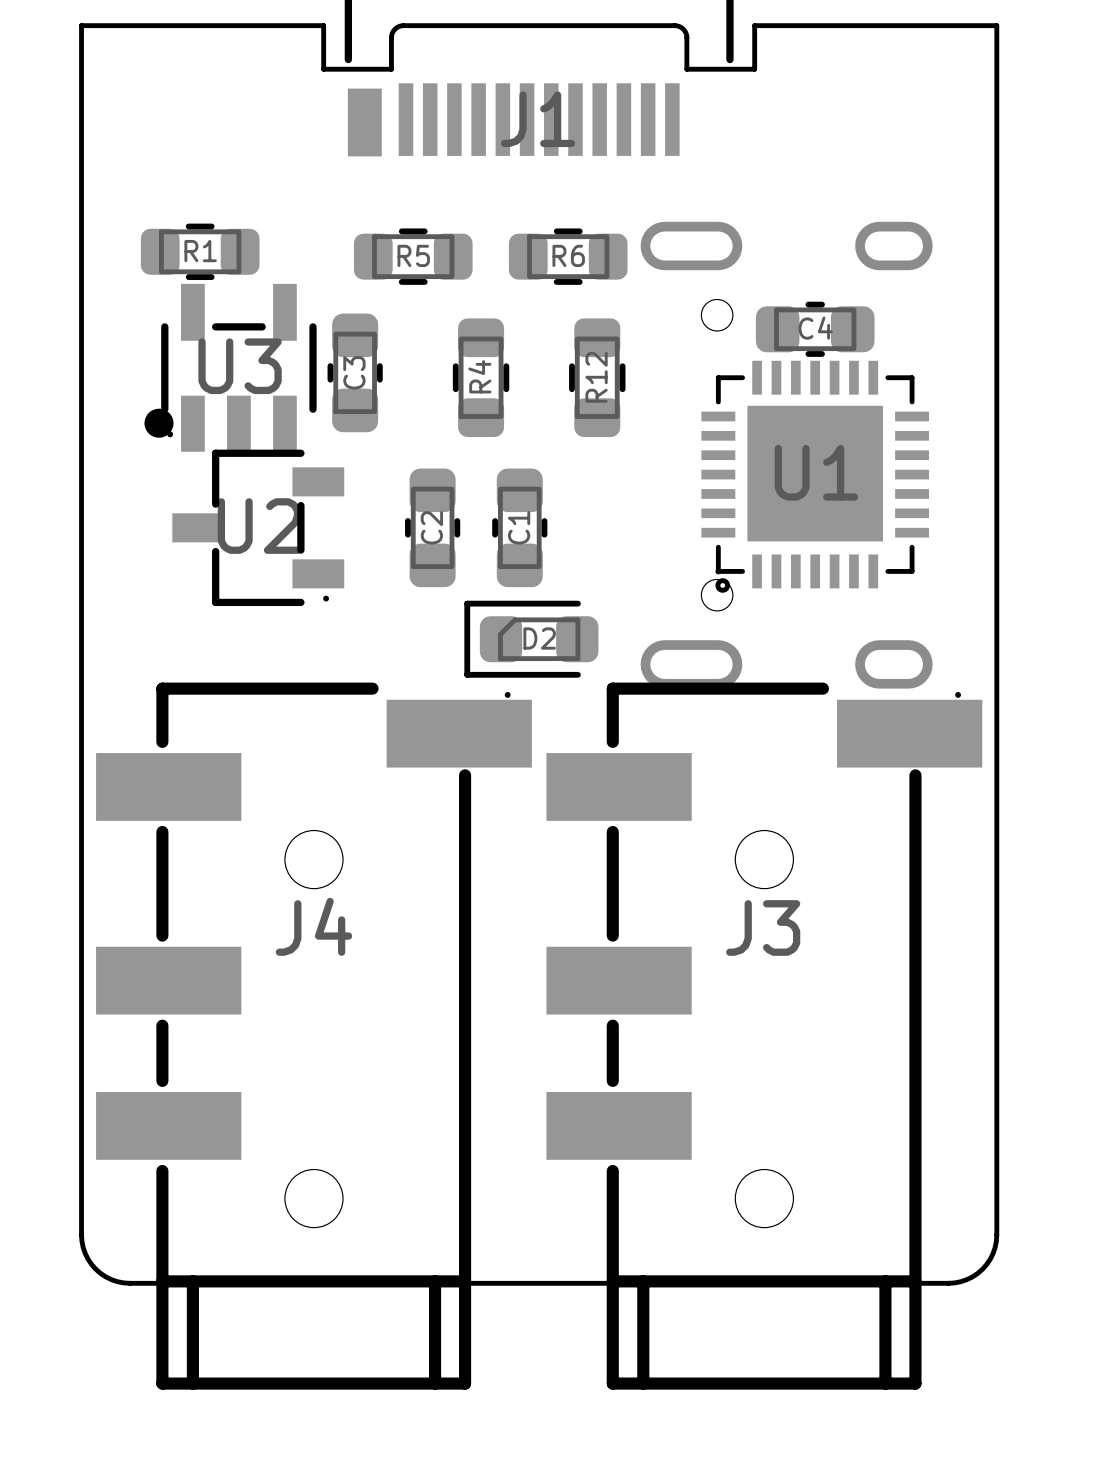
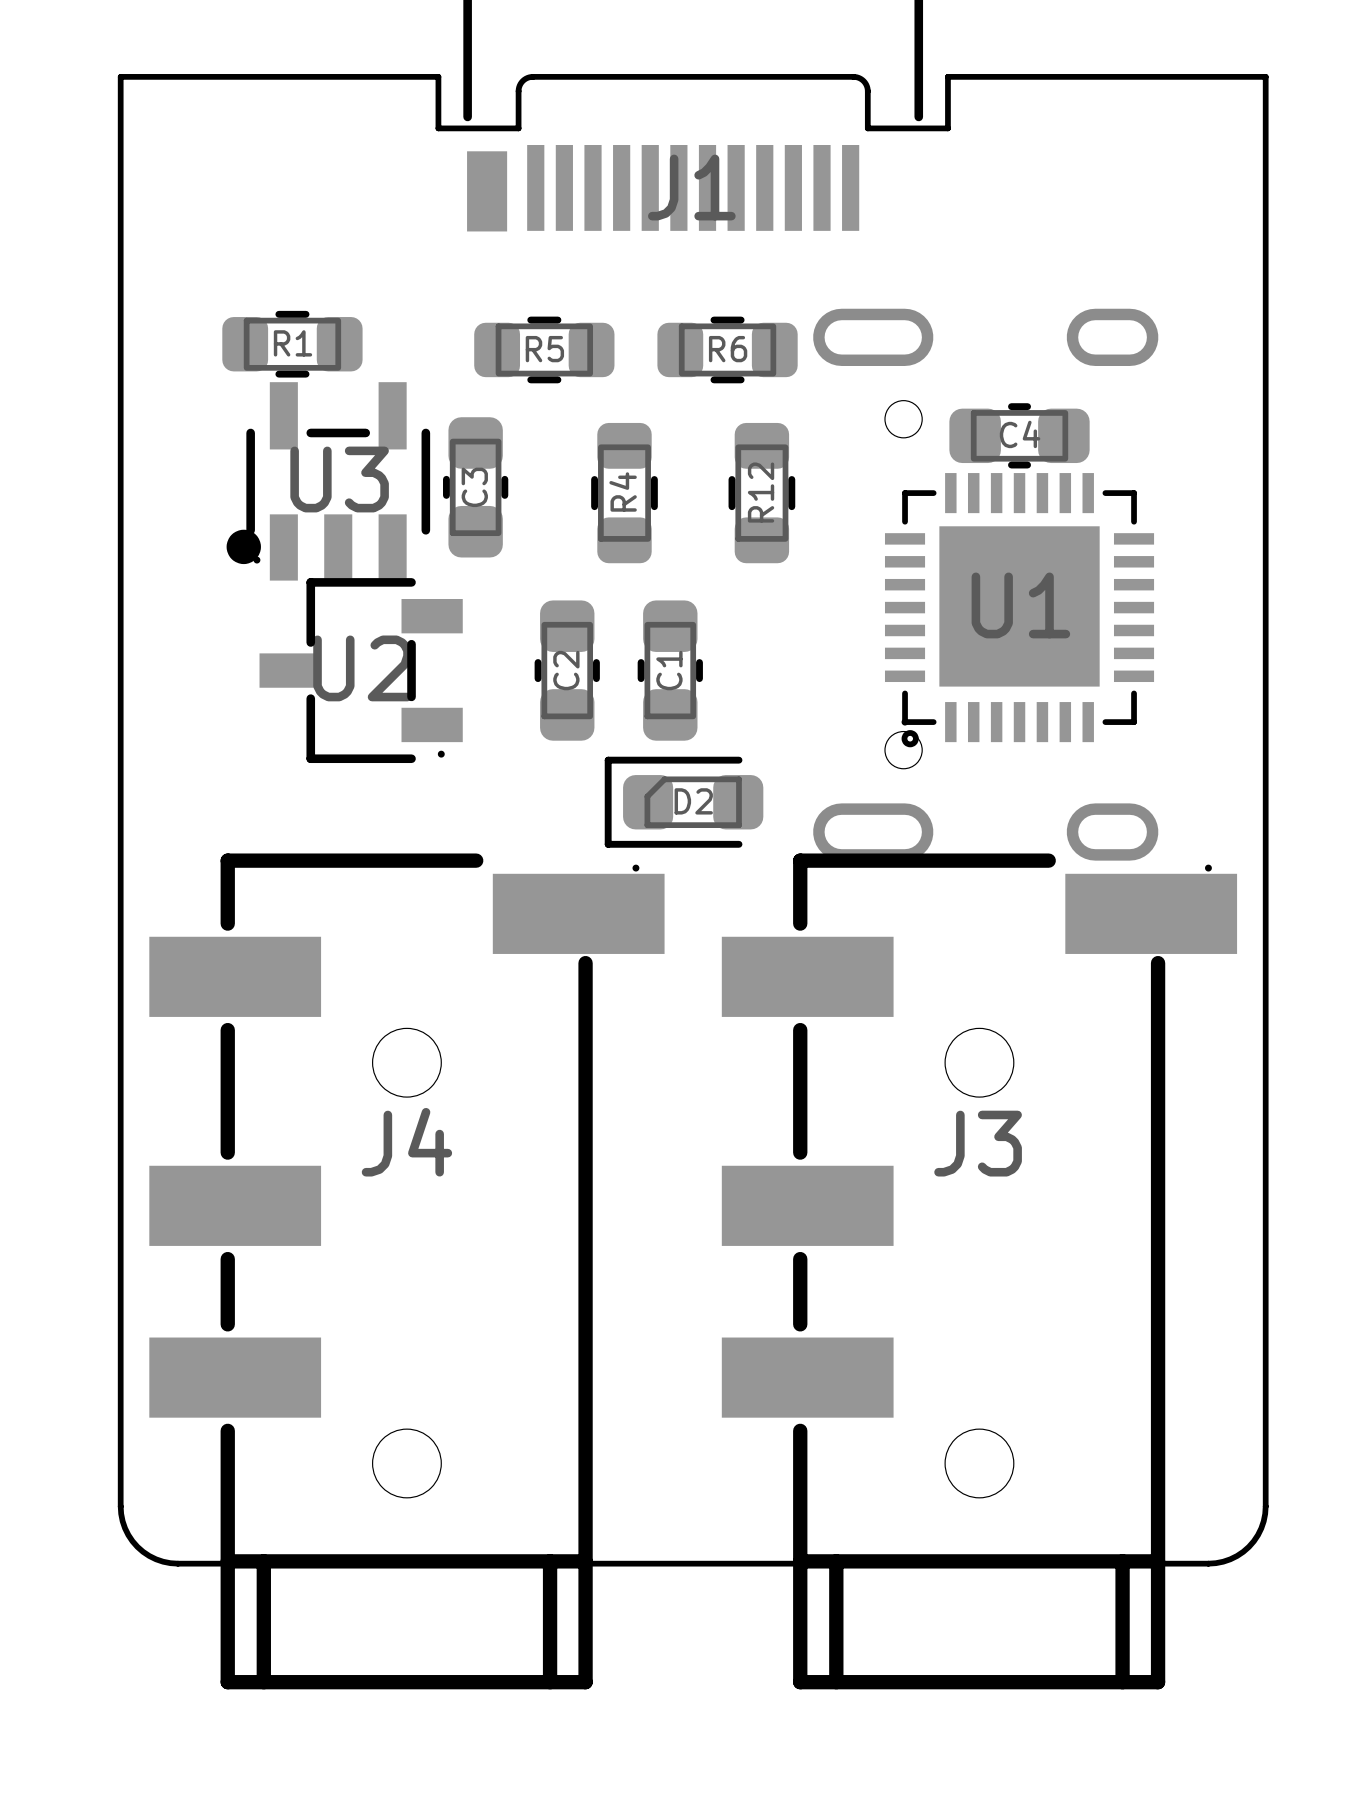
board edge: (81, 25) (81, 1234) (85, 1253) (95, 1269) (111, 1279) (129, 1283) -> (152, 76) (120, 76) (120, 1506) (122, 1521) (128, 1535) (137, 1546) (149, 1555) (170, 1563) (209, 1563)
board edge: (996, 25) (996, 1234) (993, 1253) (982, 1269) (966, 1279) (948, 1283) -> (1234, 76) (1265, 76) (1265, 1506) (1263, 1521) (1258, 1535) (1248, 1546) (1237, 1555) (1215, 1563) (1176, 1563)
J4 position: (313, 1036) -> (406, 1271)
J3 position: (764, 1036) -> (979, 1271)

